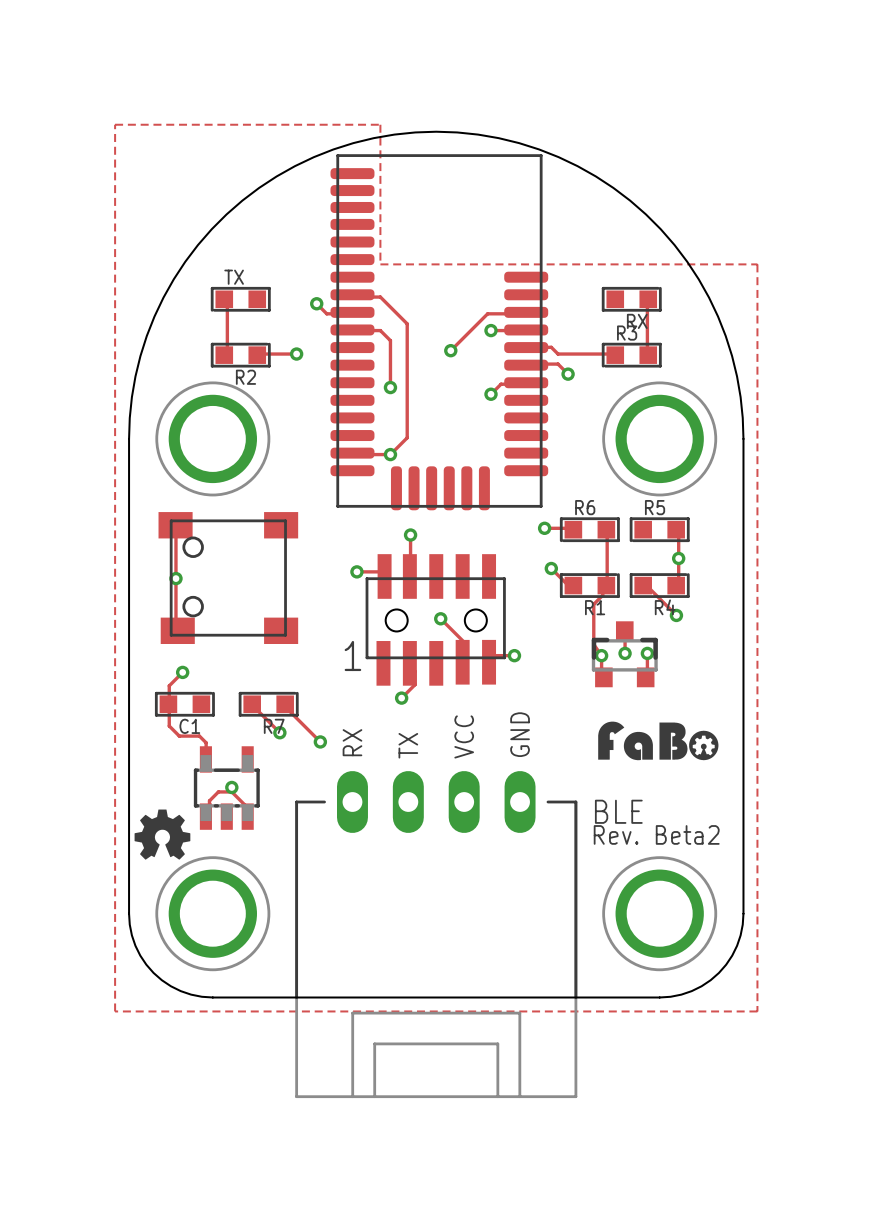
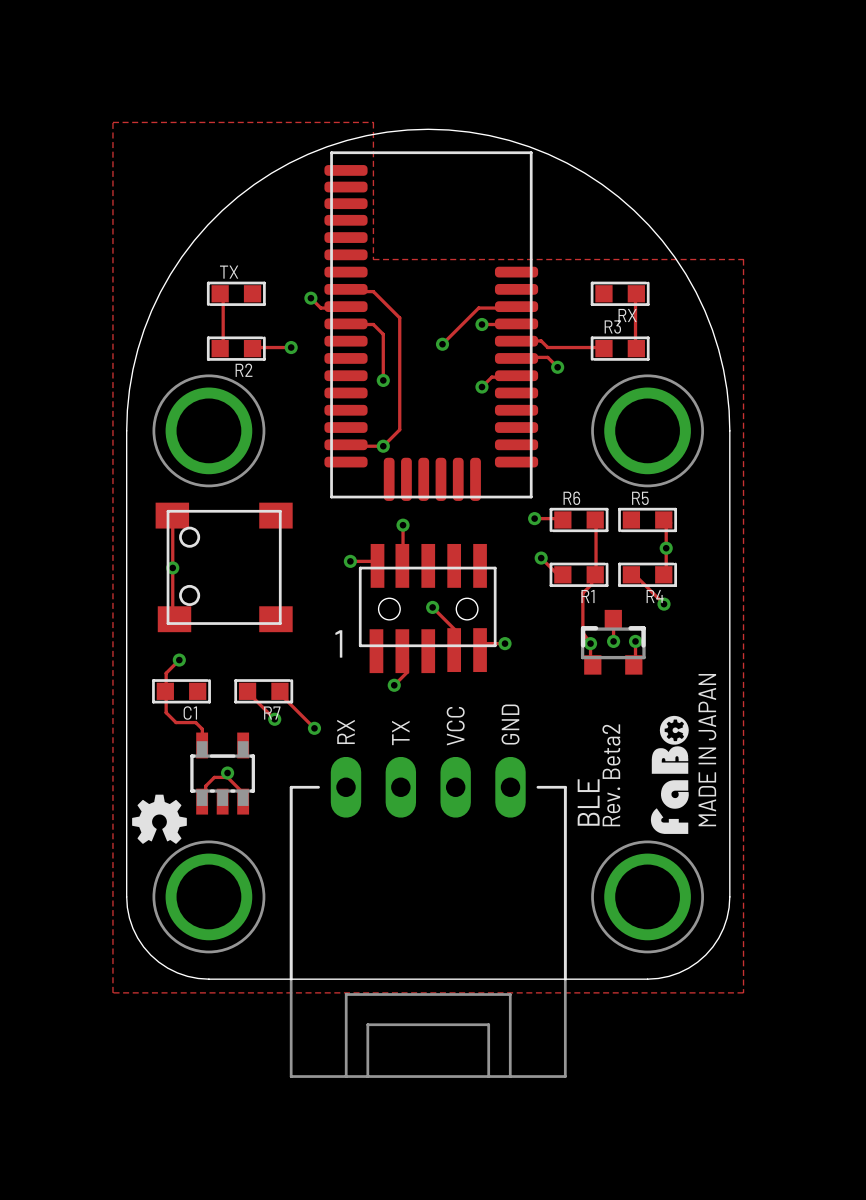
drawing: [598, 721, 719, 761] -> none
drawing: none -> [650, 715, 689, 834]
text: none -> MADE IN JAPAN (707, 750)
text rotation: 0° (618, 811) -> 90° counterclockwise (588, 802)
text rotation: 0° (656, 834) -> 90° counterclockwise (611, 775)

